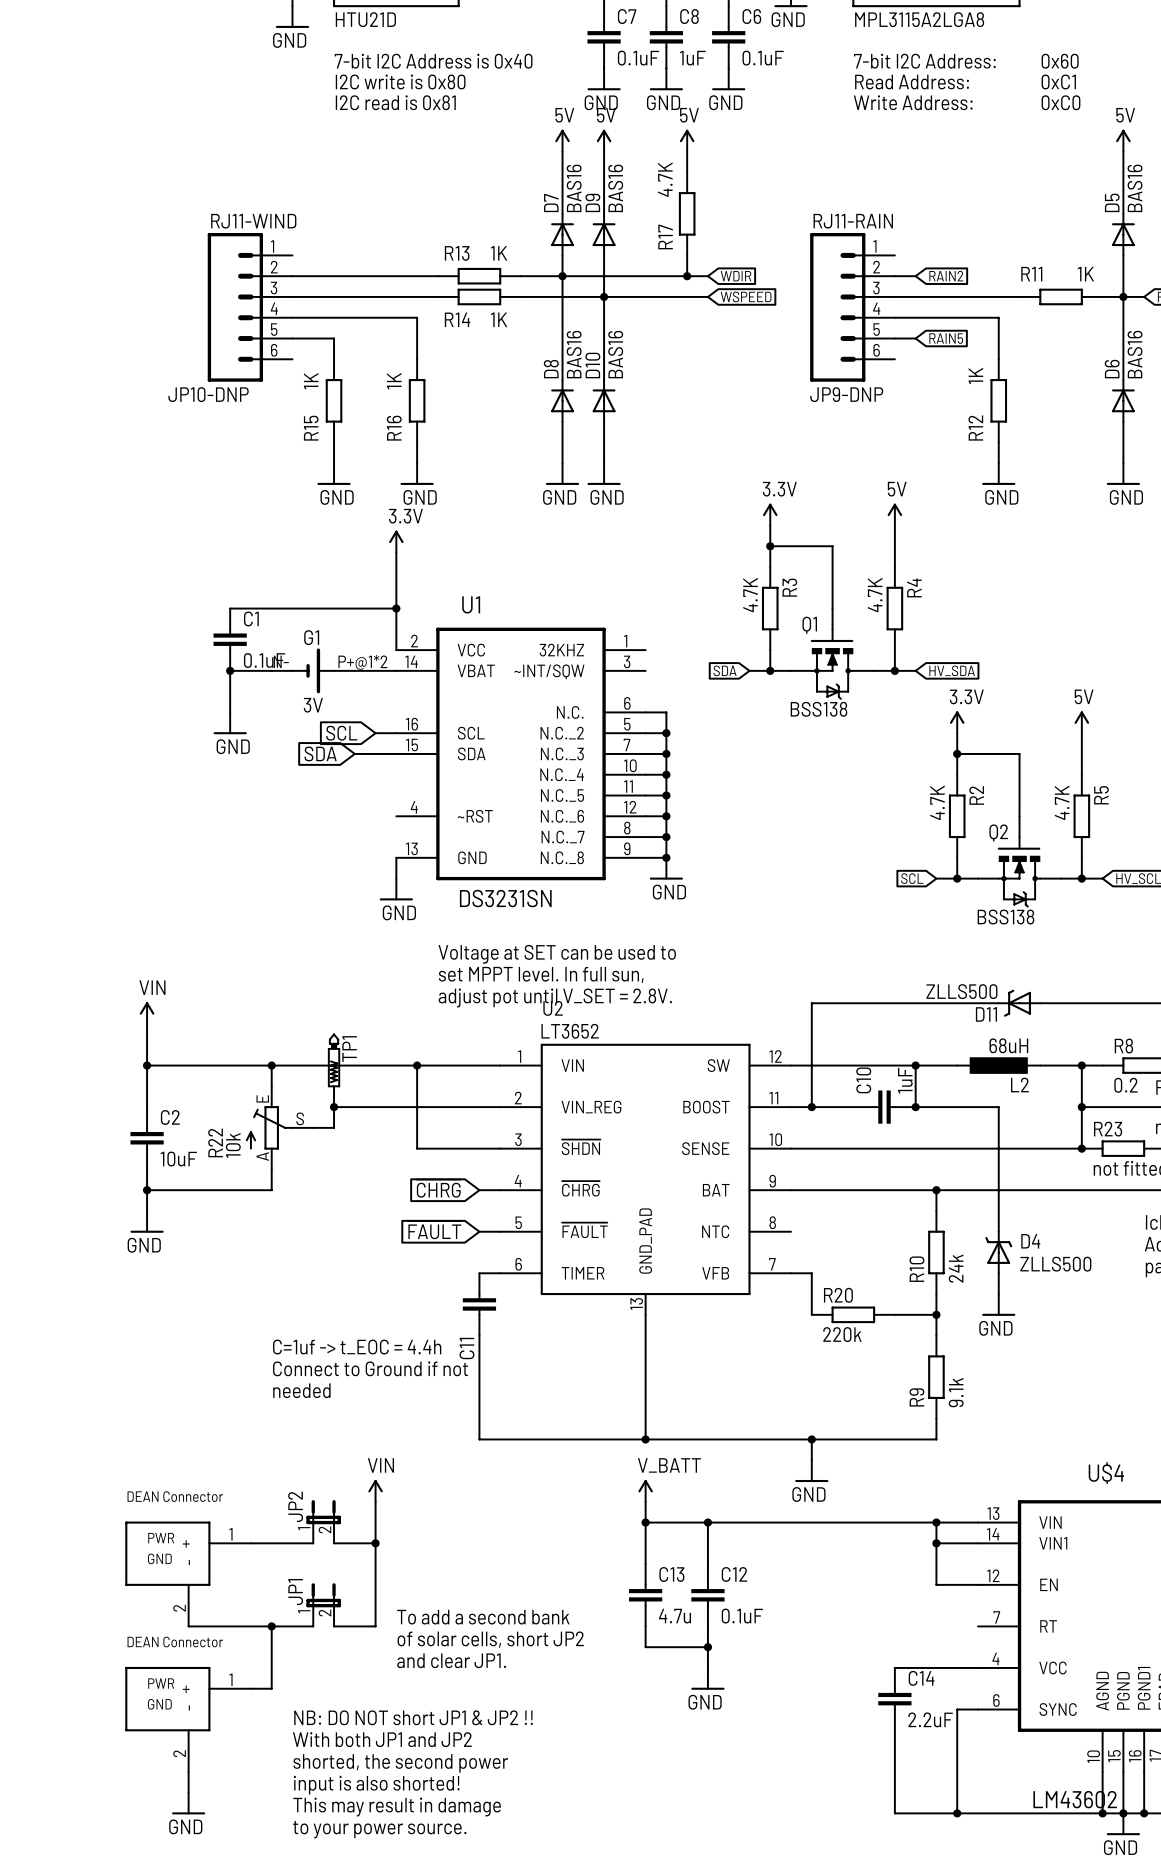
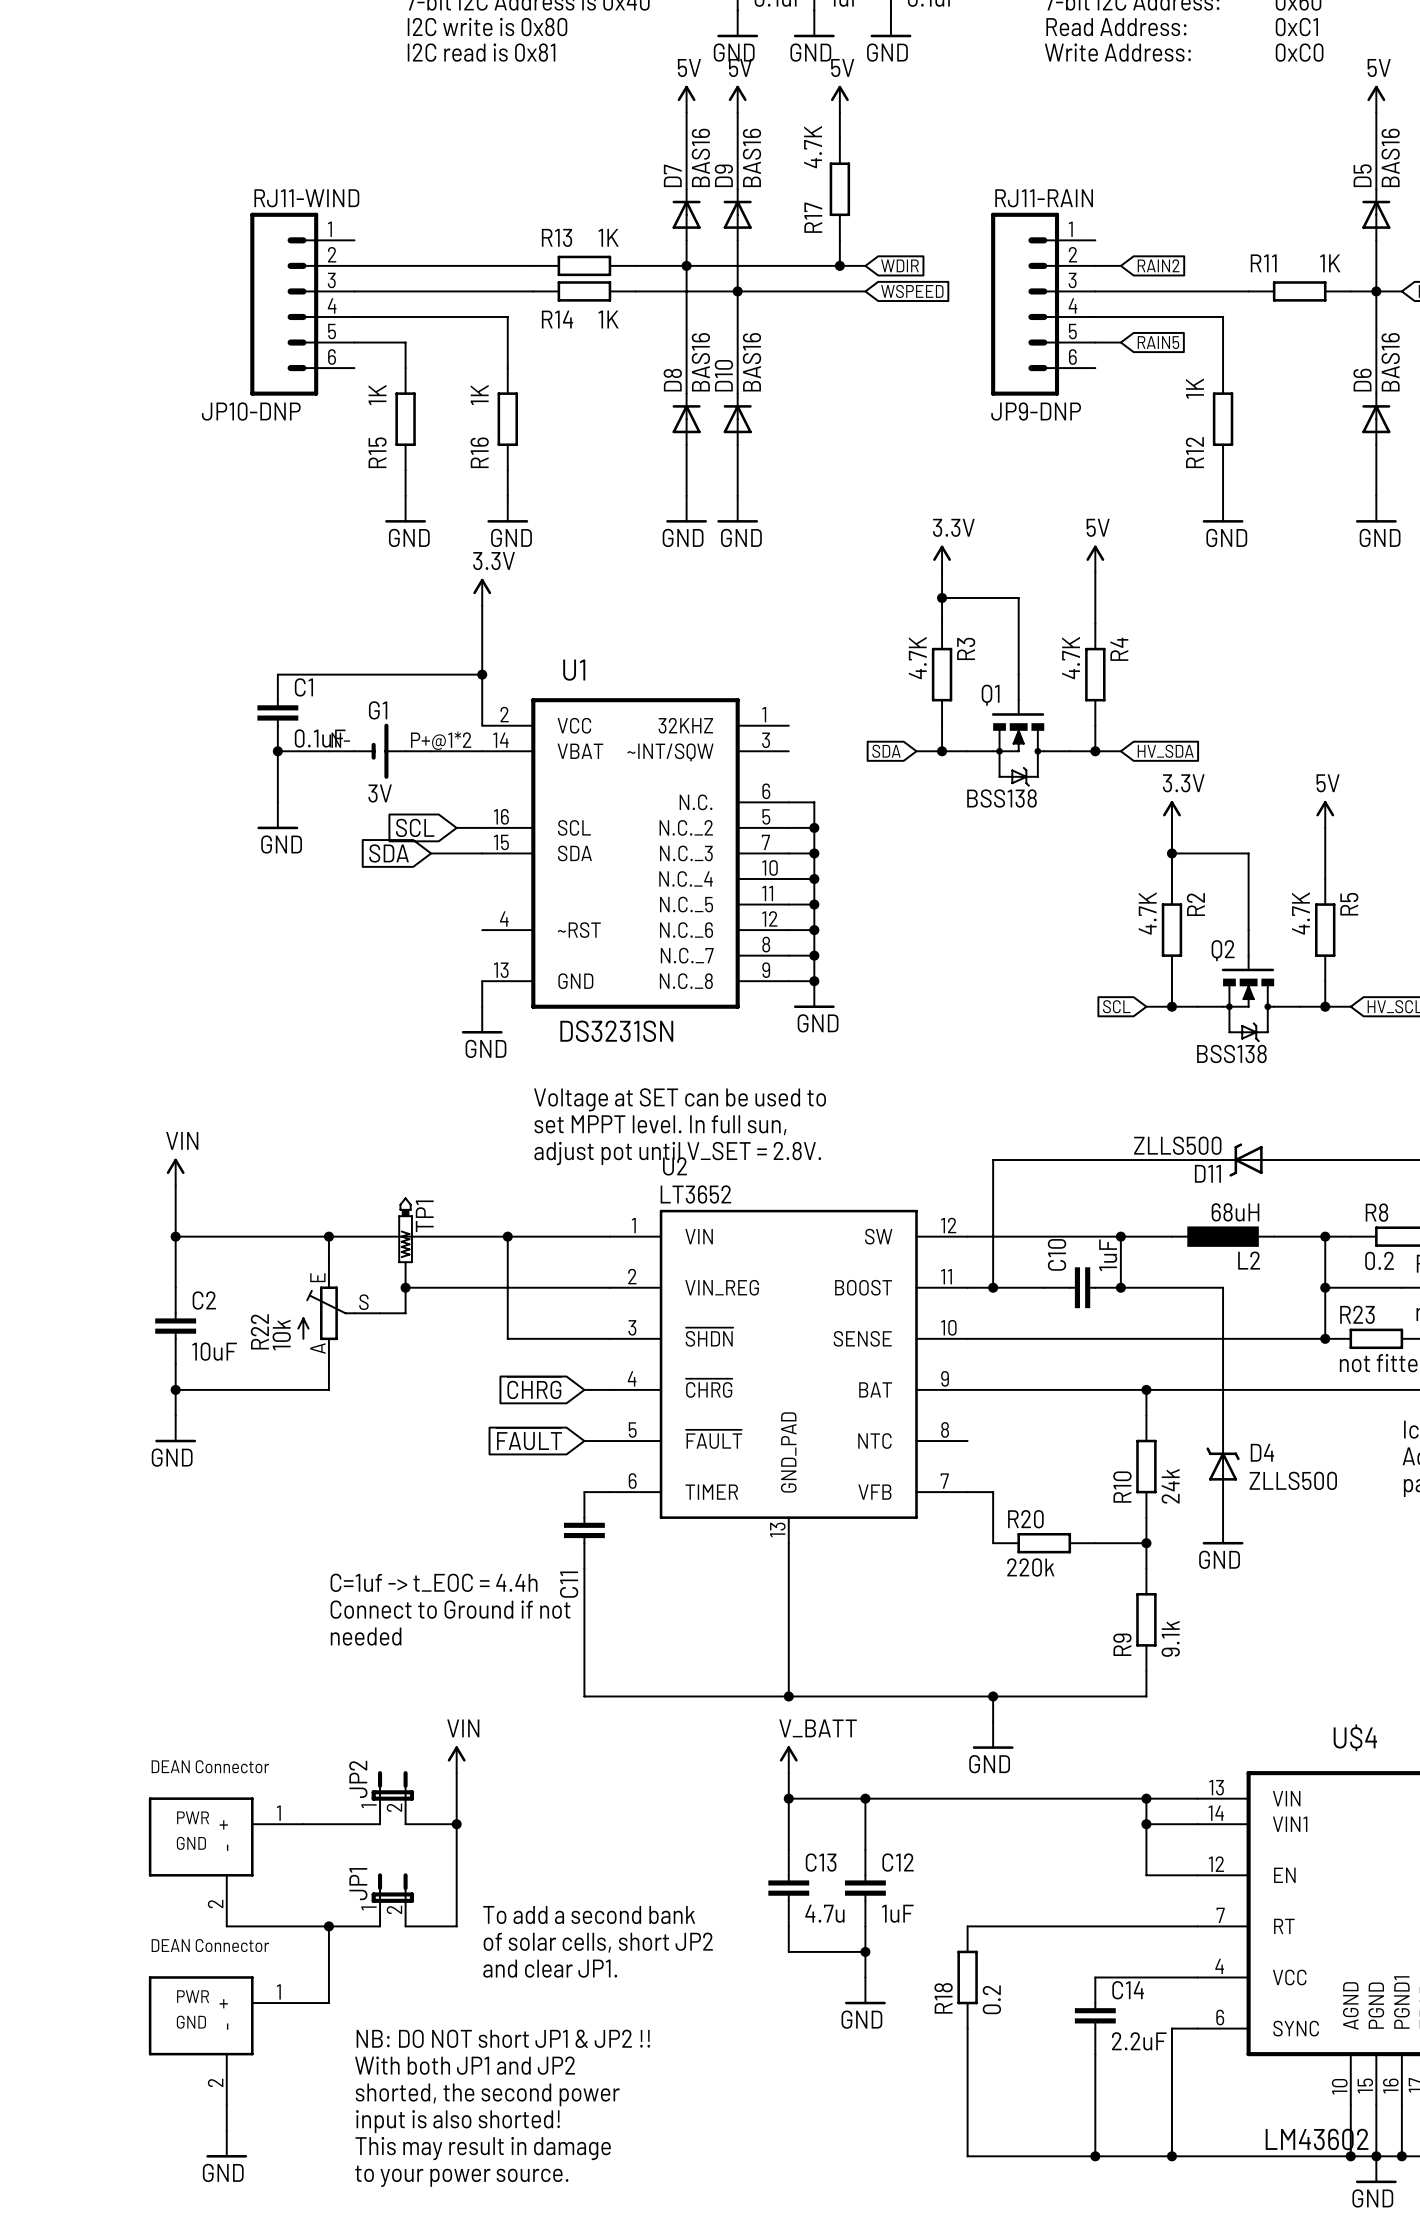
C12 value: 0.1uF (742, 1616) -> 1uF (897, 1913)
wire: none -> (967, 1926) (1197, 1926)
R18: none -> 0.2 (967, 1977)
wire: none -> (967, 2028) (967, 2156) (1095, 2156)
junction: none -> (1095, 2156)

